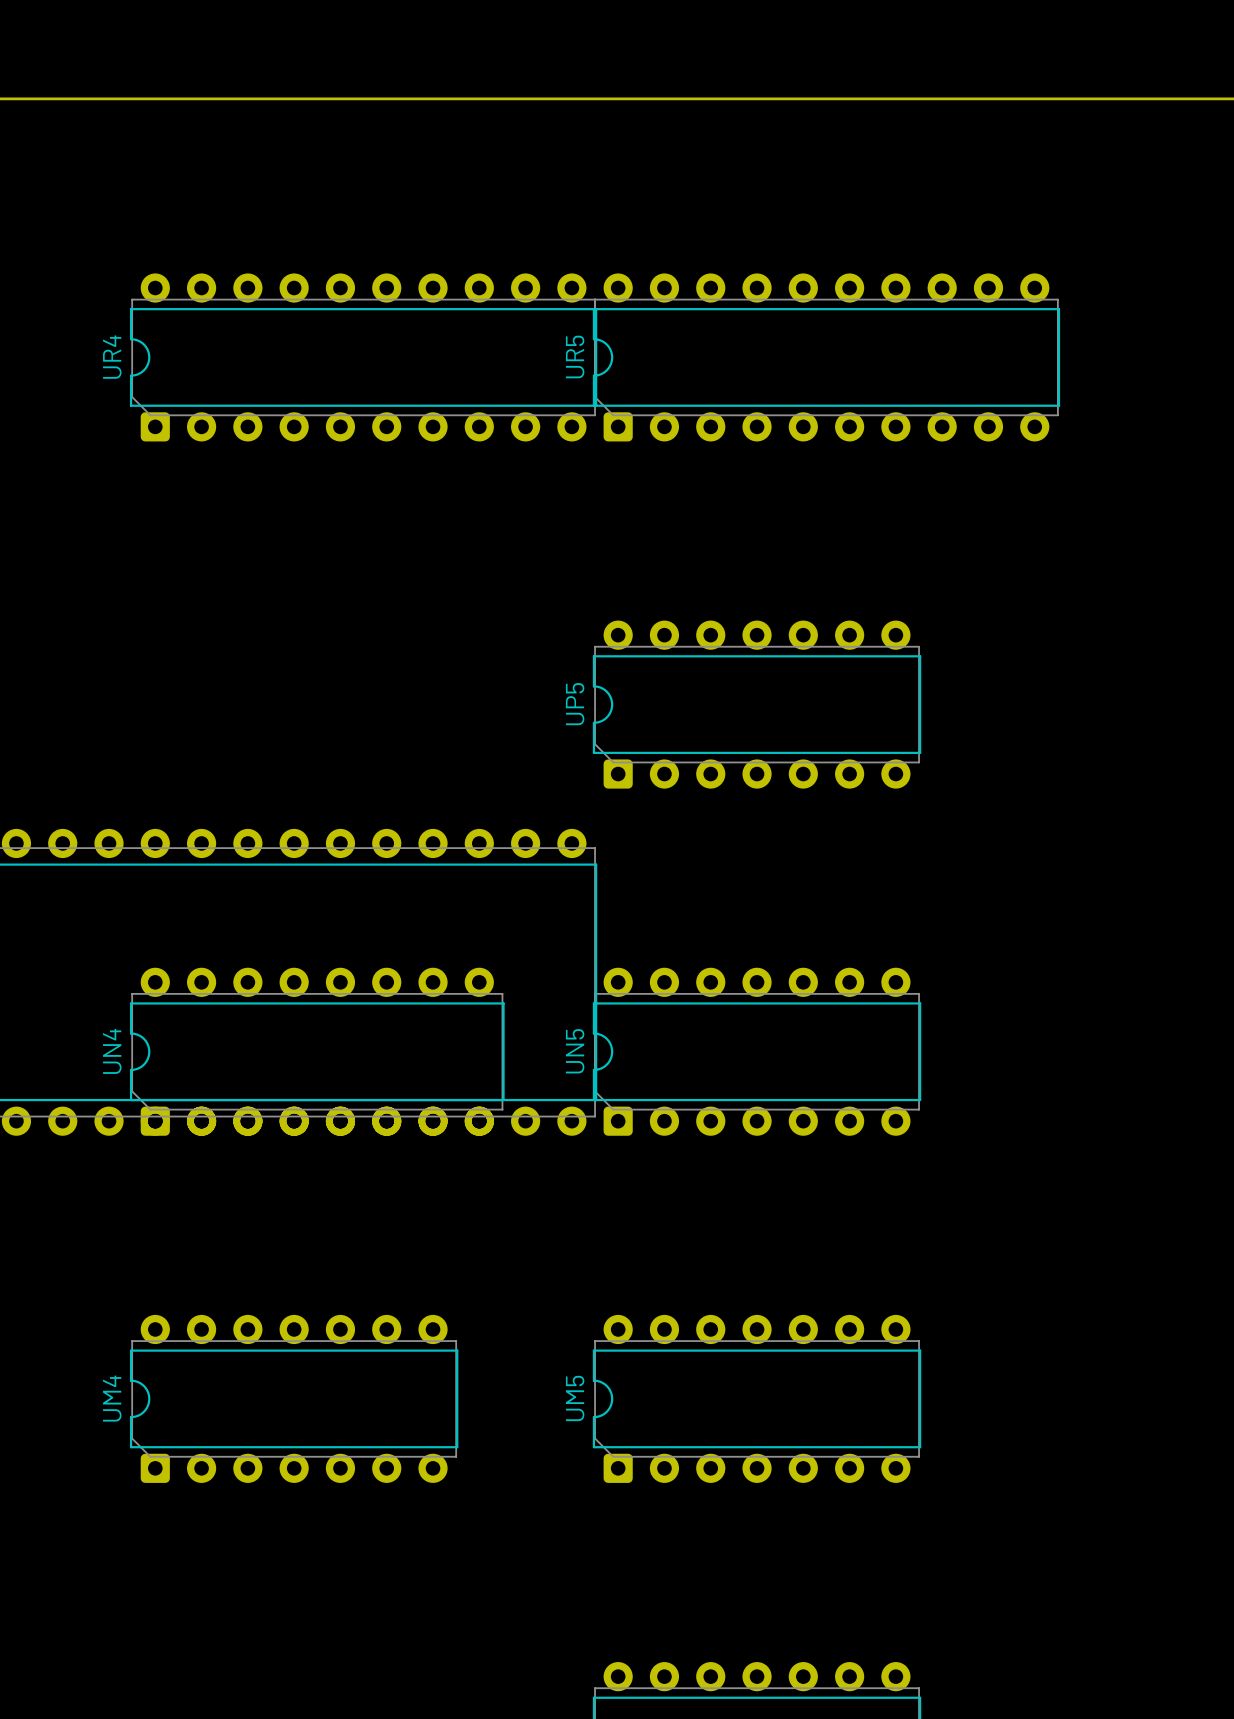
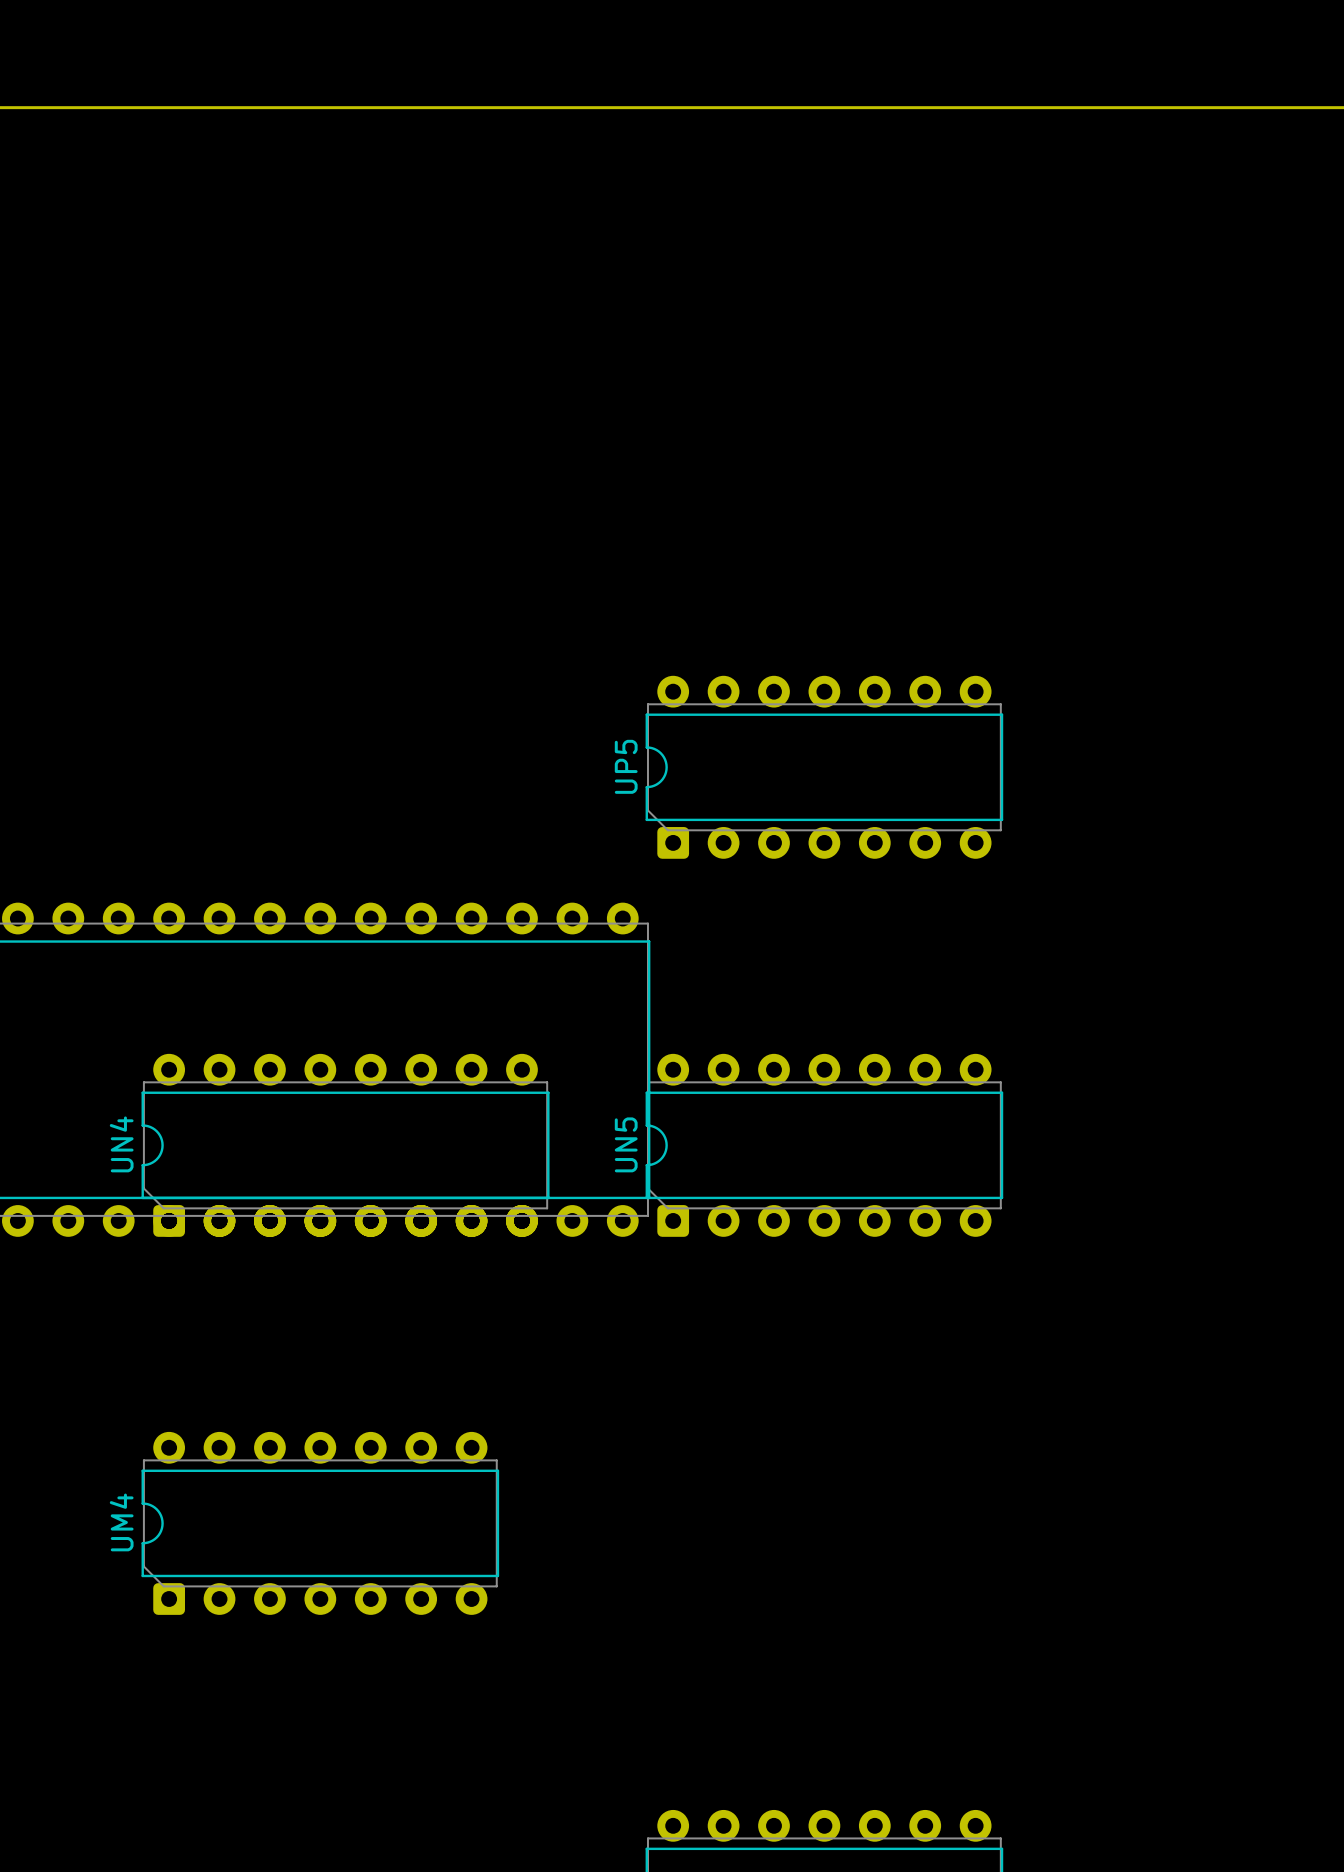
UR4: (363, 357) -> none
UR5: (826, 357) -> none
UM5: (757, 1398) -> none

